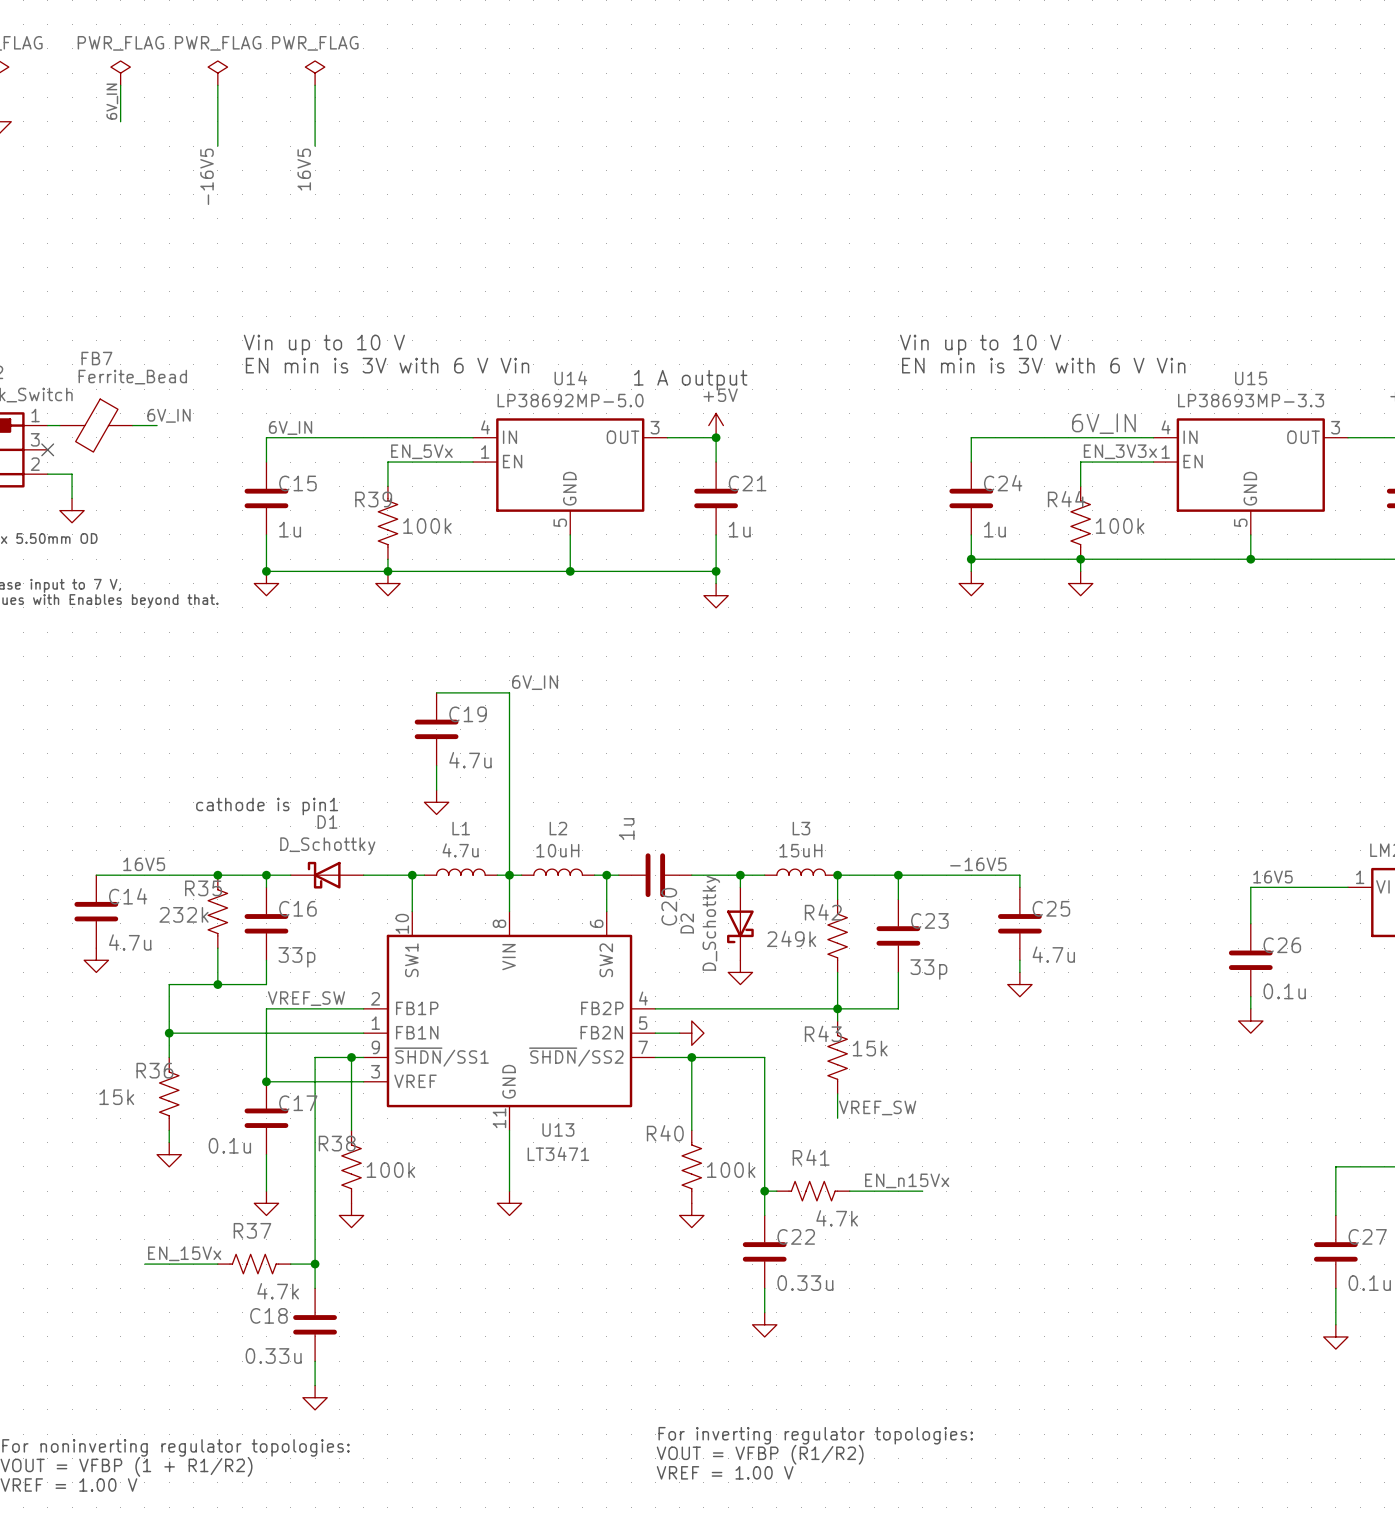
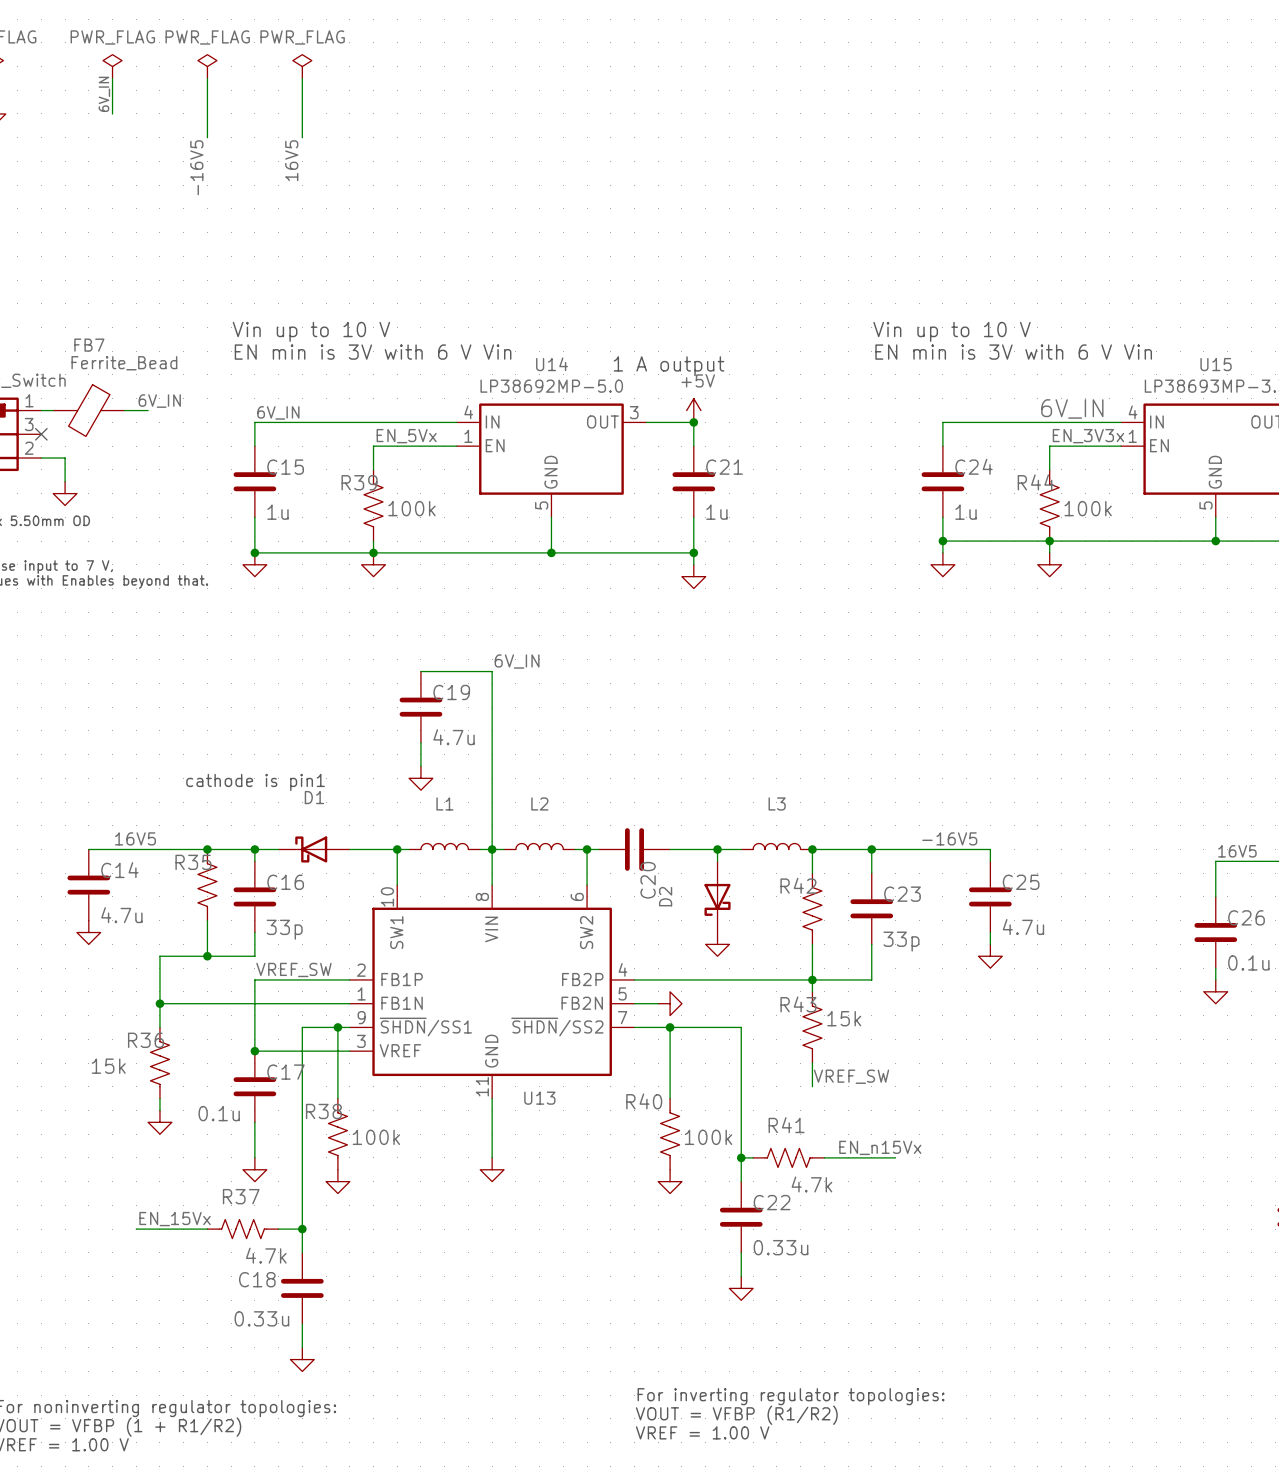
C20 value: 1u (626, 829) -> none
D1 value: D_Schottky (327, 846) -> none
L1 value: 4.7u (460, 850) -> none
L2 value: 10uH (557, 850) -> none
L3 value: 15uH (800, 850) -> none
R35 value: 232k (183, 914) -> none
D2 value: D_Schottky (711, 923) -> none
R42 value: 249k (791, 938) -> none
U13 value: LT3471 (558, 1153) -> none

